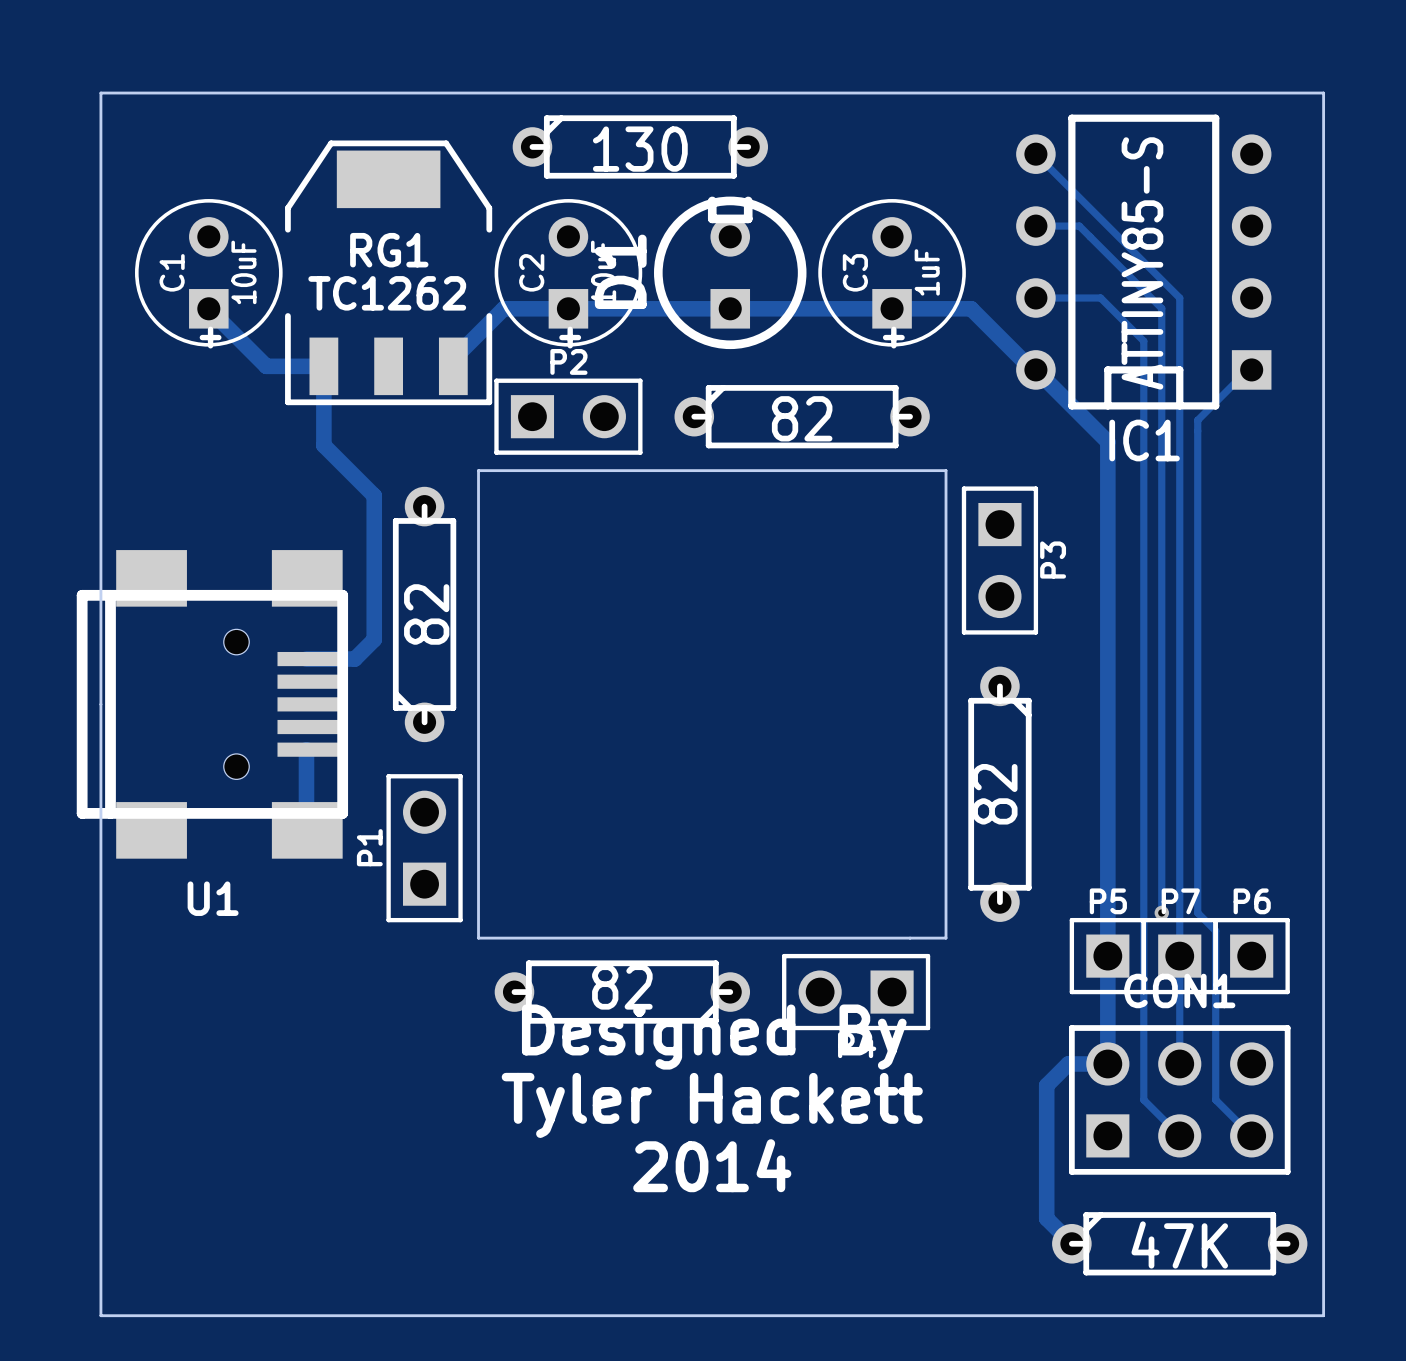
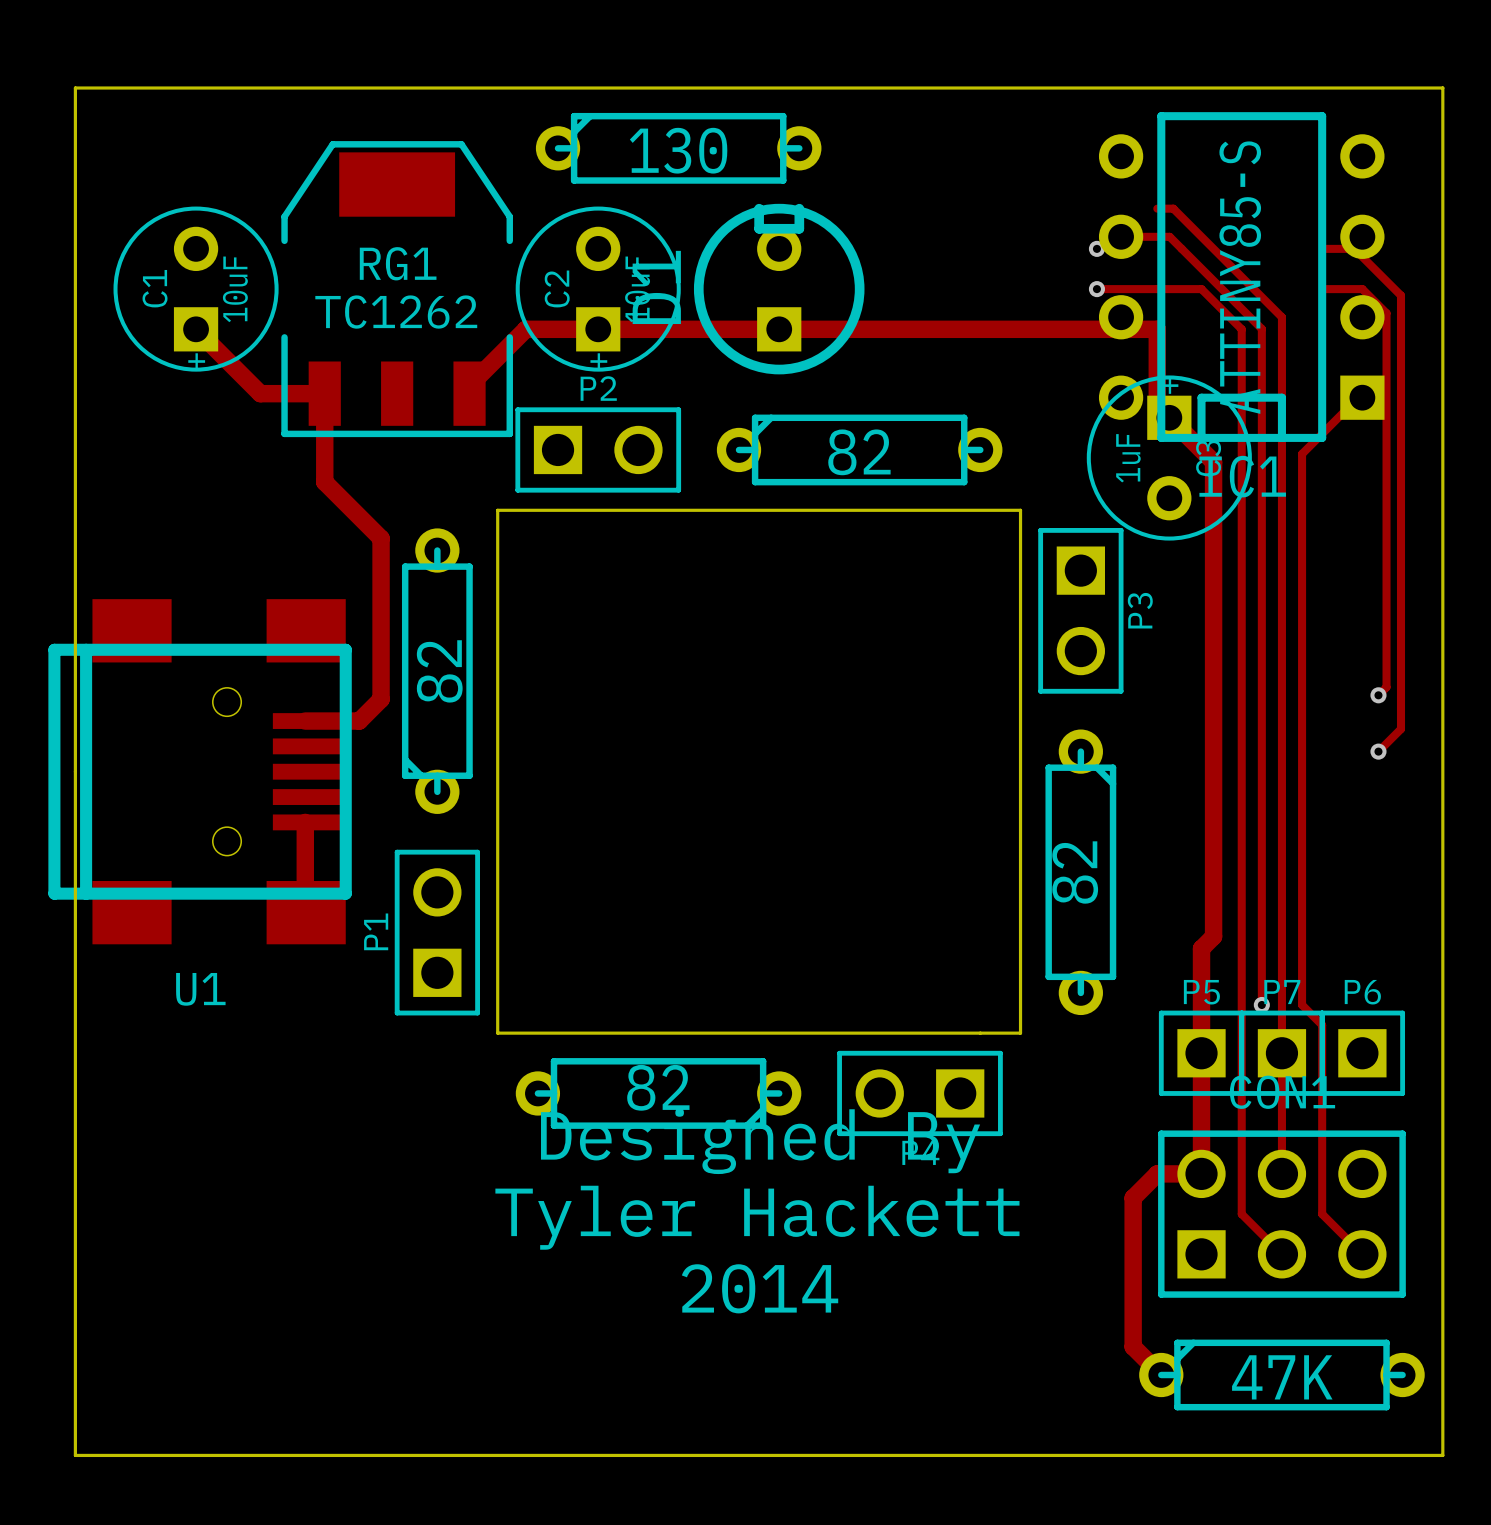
track: (1035, 154) (1082, 200) -> (1157, 208) (1173, 208)
via: none -> (1096, 248)
track: none -> (1326, 248) (1354, 248) (1401, 295) (1401, 729) (1378, 751)
C3 rotation: 0° (892, 272) -> 180° (1169, 458)
C3 position: (892, 272) -> (1169, 458)
via: none -> (1096, 289)
track: none -> (1326, 289) (1362, 289) (1386, 313) (1386, 687) (1378, 695)
track: (1035, 298) (1100, 298) (1143, 341) -> (1096, 289) (1201, 289) (1241, 329) (1241, 365)
track: (971, 308) (1107, 441) (1107, 862) -> (1048, 329) (1157, 329) (1157, 405) (1213, 462) (1213, 936) (1201, 948)
via: none -> (1378, 695)
via: none -> (1378, 751)

